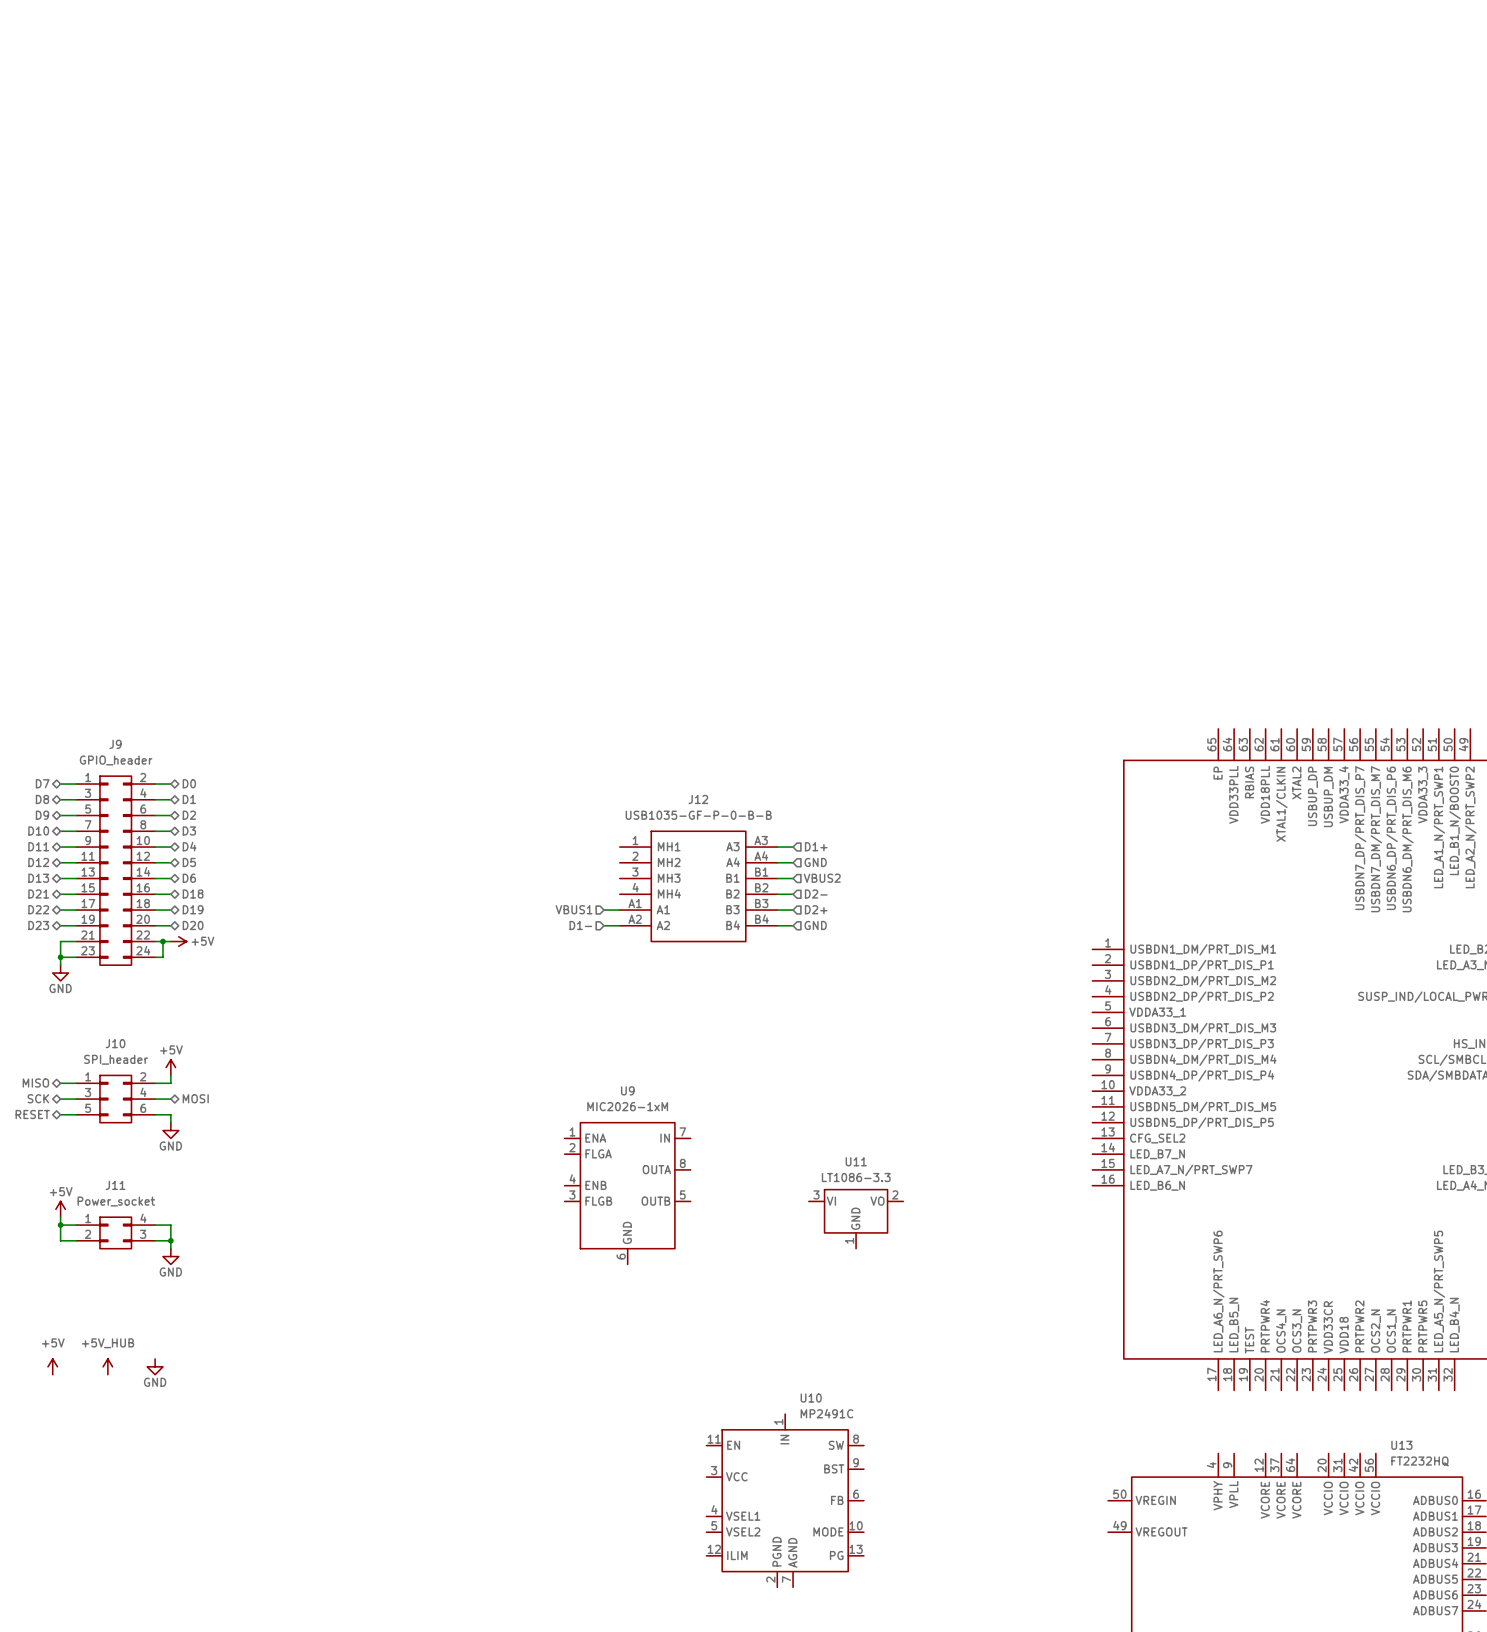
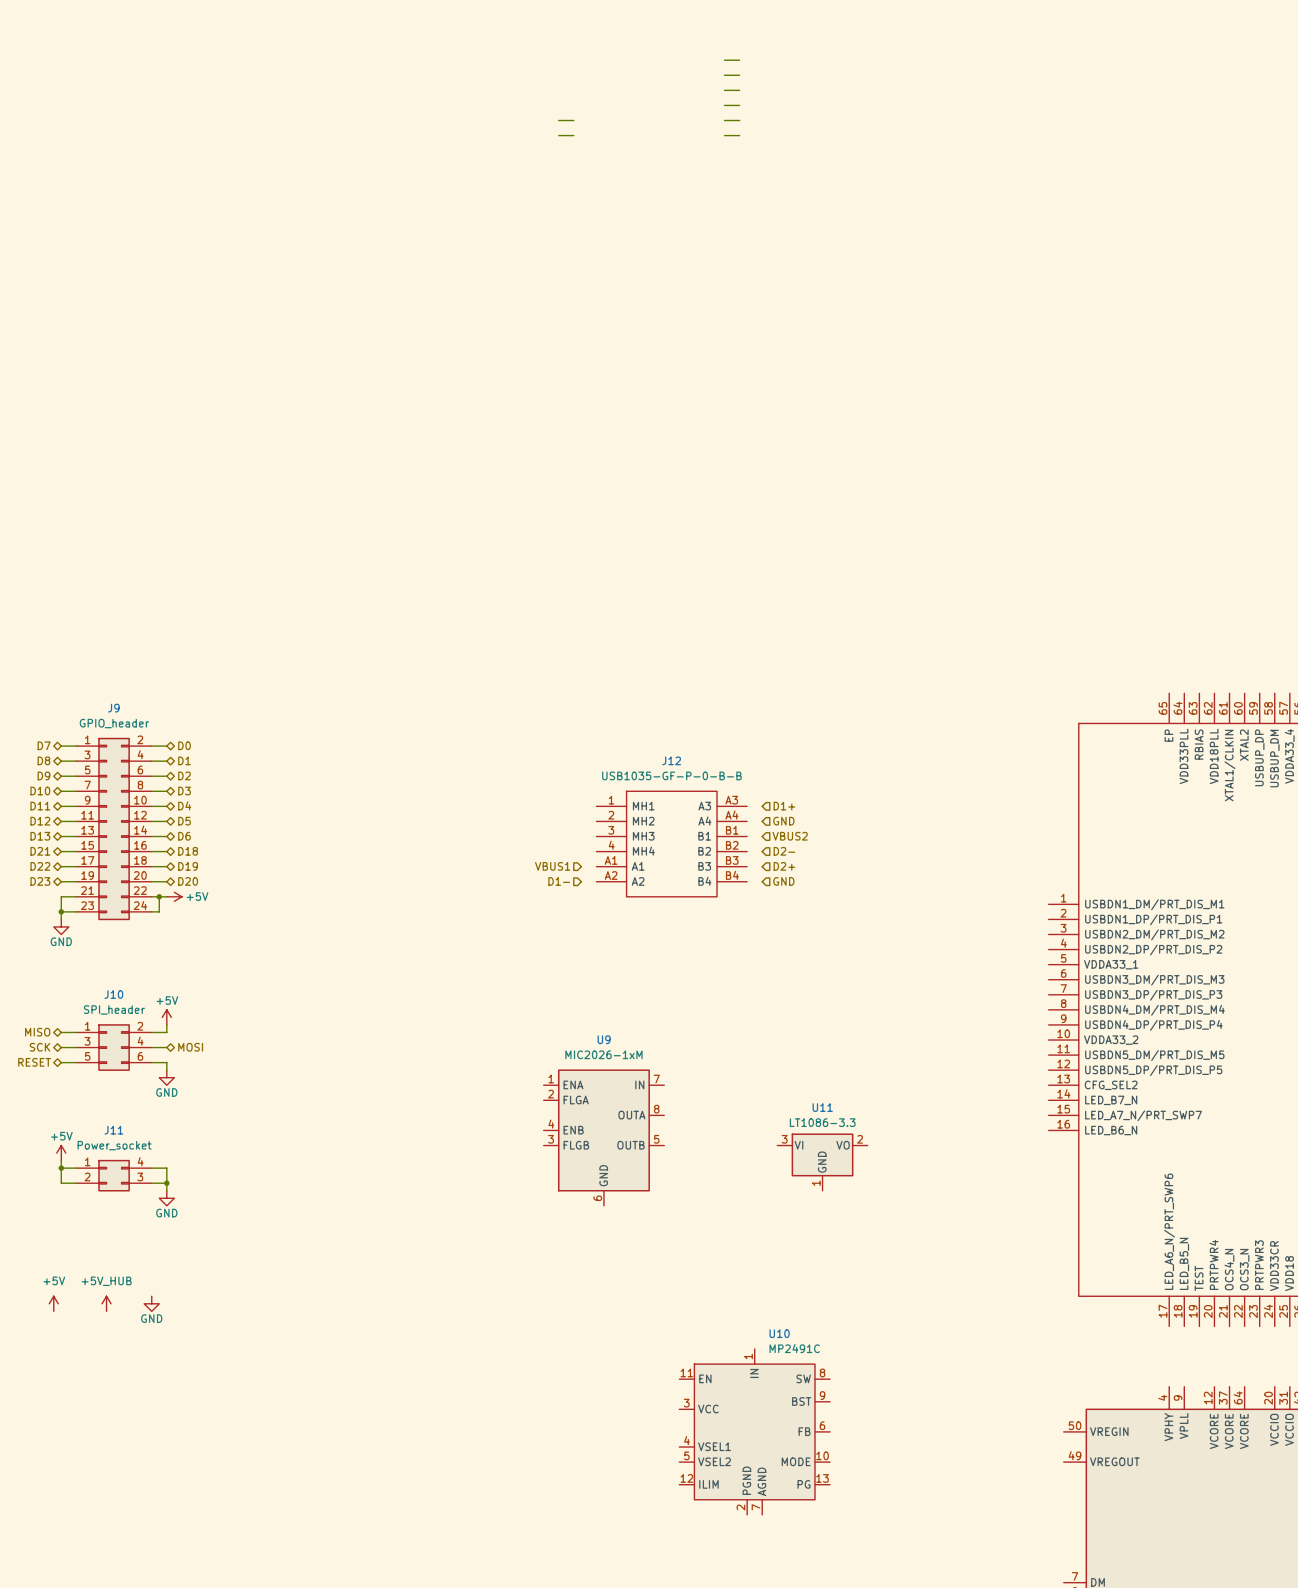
wire: none -> (724, 60) (739, 60)
wire: none -> (724, 75) (739, 75)
wire: none -> (724, 90) (739, 90)
wire: none -> (724, 105) (739, 105)
wire: none -> (558, 120) (573, 120)
wire: none -> (724, 120) (739, 120)
wire: none -> (558, 135) (573, 135)
wire: none -> (724, 135) (739, 135)
wire: (777, 847) (793, 847) -> none
wire: (777, 862) (793, 862) -> none
wire: (777, 878) (793, 878) -> none
wire: (777, 894) (793, 894) -> none
wire: (604, 910) (619, 910) -> none
wire: (777, 910) (793, 910) -> none
wire: (604, 925) (619, 925) -> none
wire: (777, 925) (793, 925) -> none

